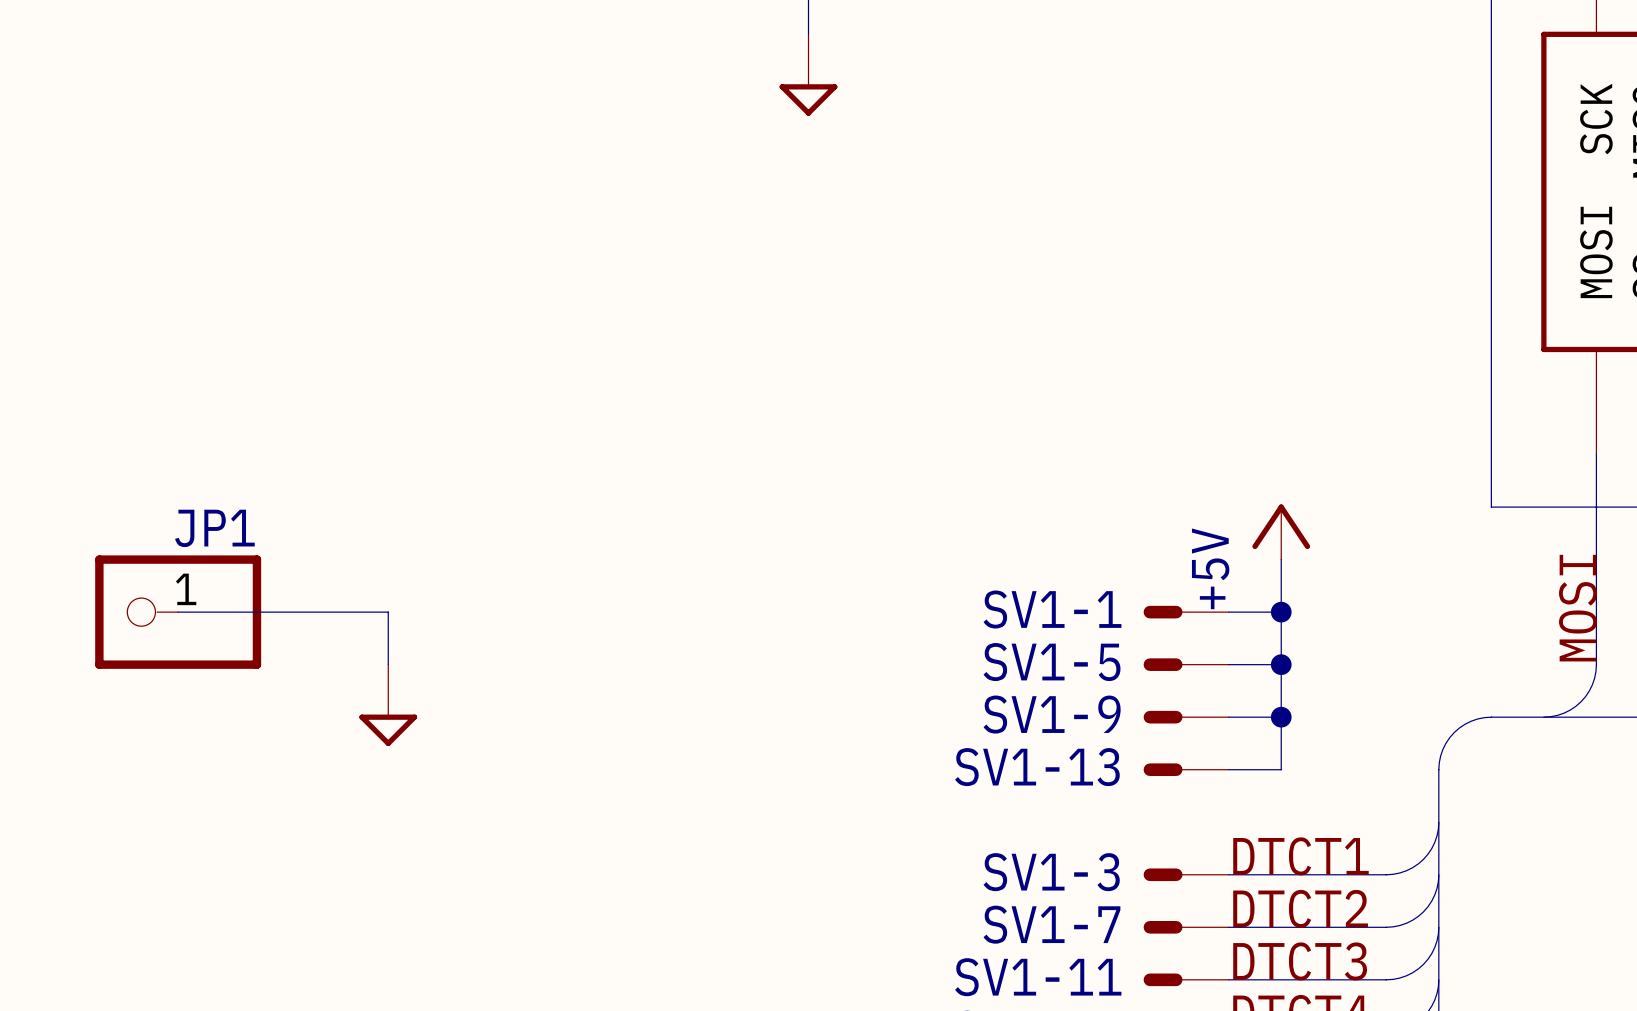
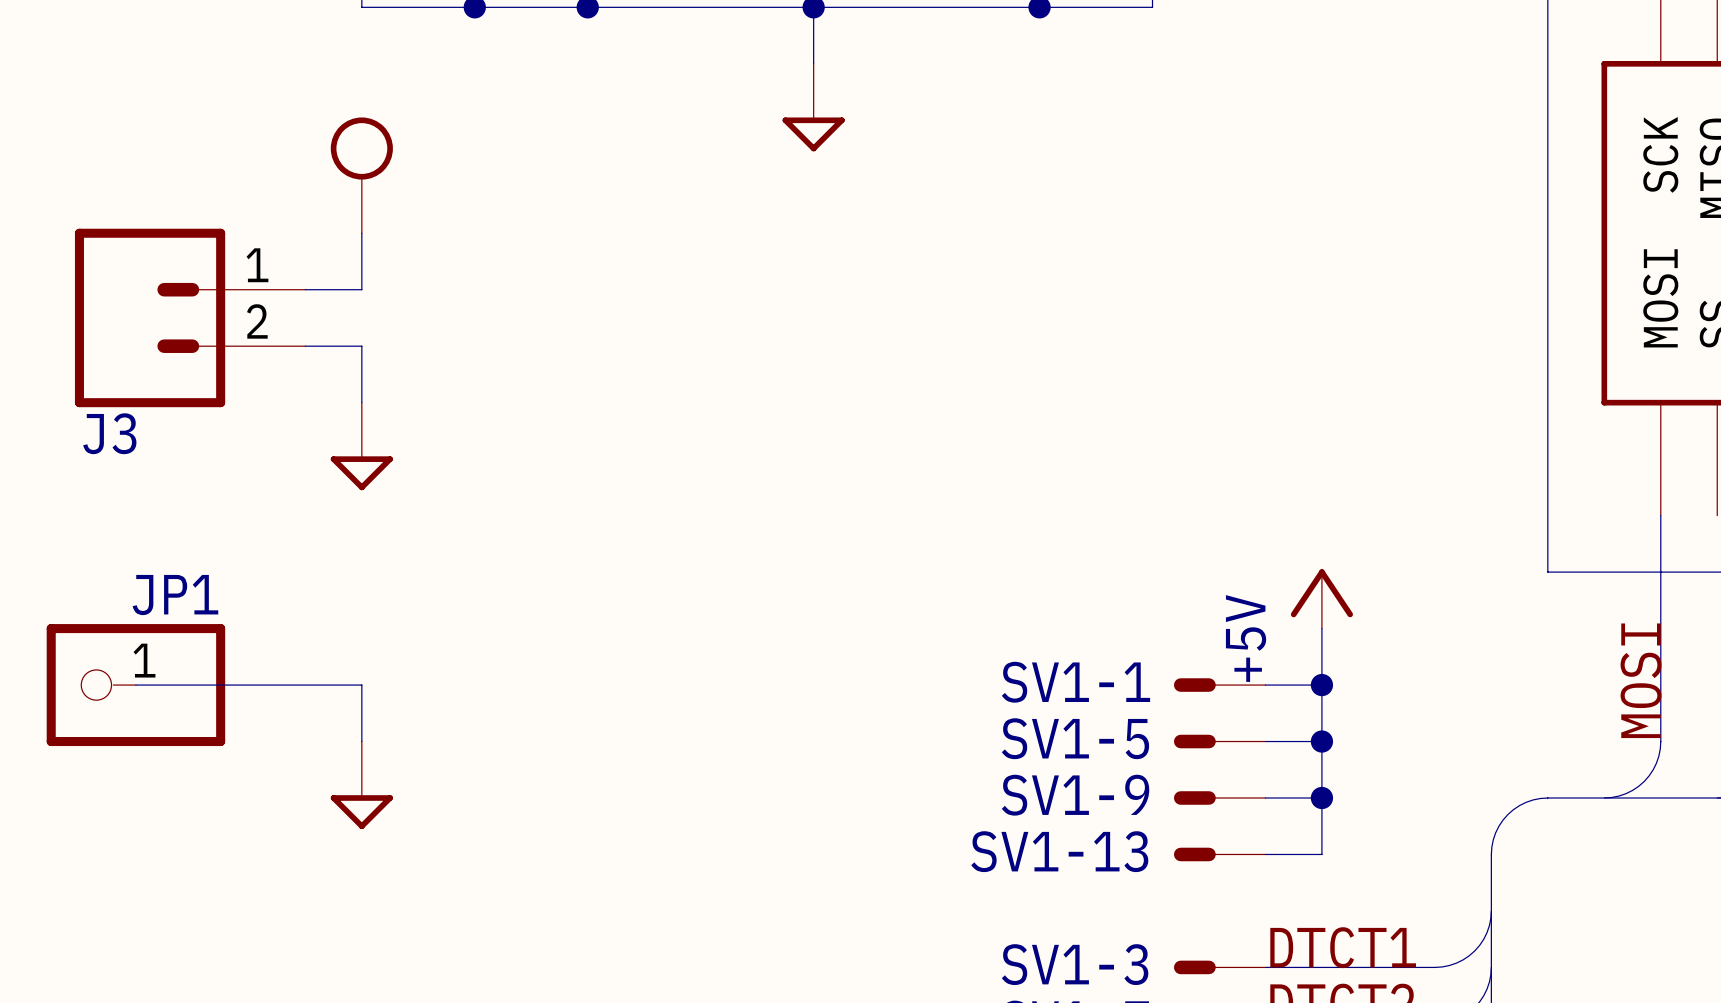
power symbol: none -> (361, 175)
wire: none -> (361, 233) (361, 289) (305, 289)
J3: none -> (190, 317)
wire: none -> (305, 346) (361, 346) (361, 402)
power symbol: none -> (361, 446)

